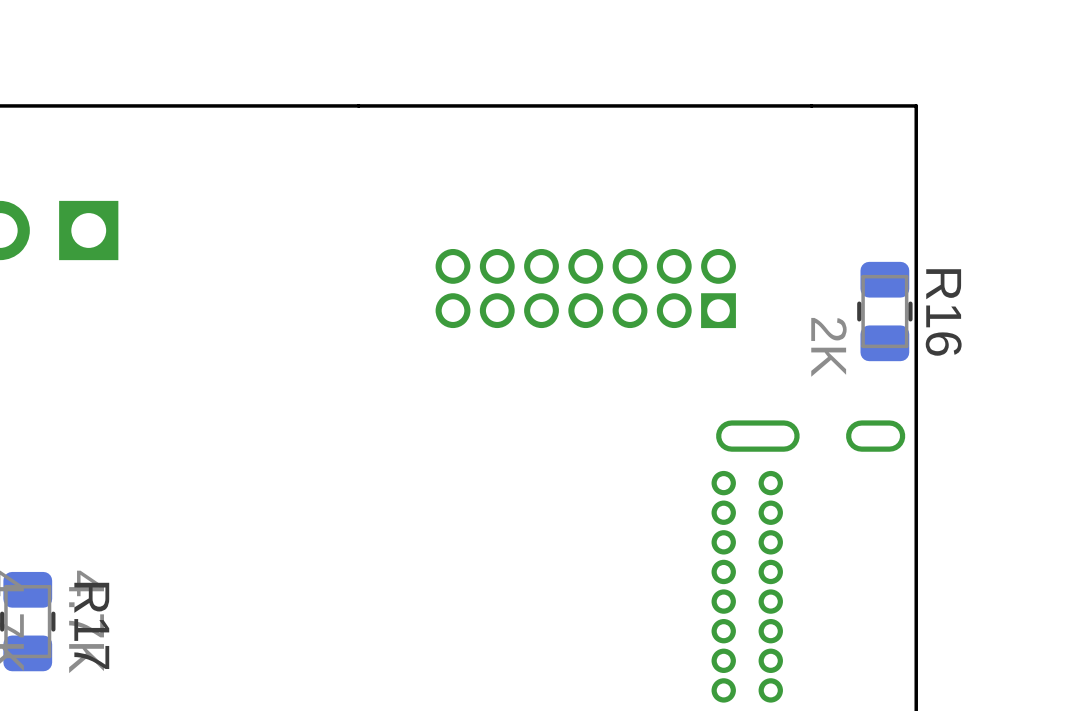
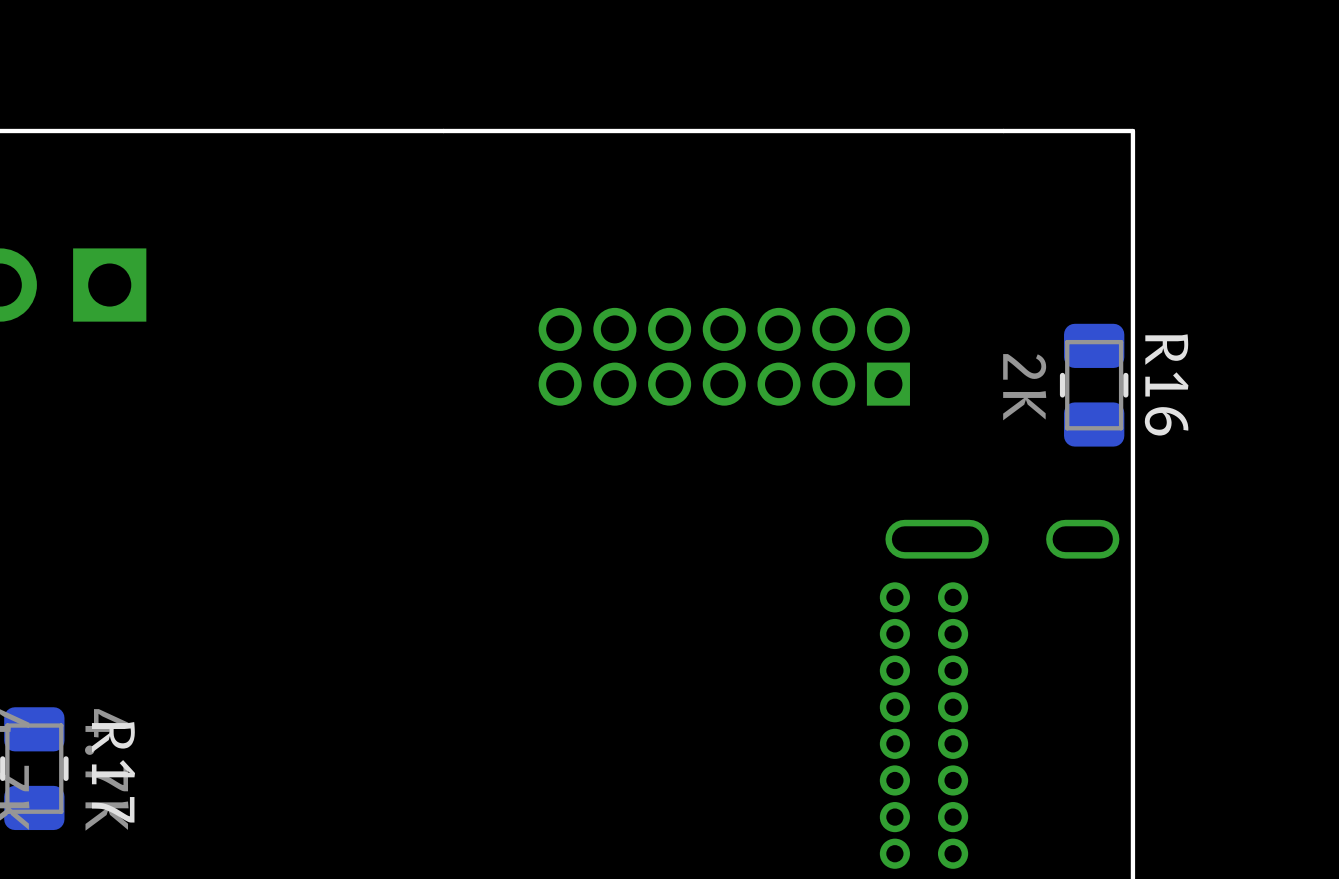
R16 value position: 2K (828, 347) -> 2K (1024, 387)

